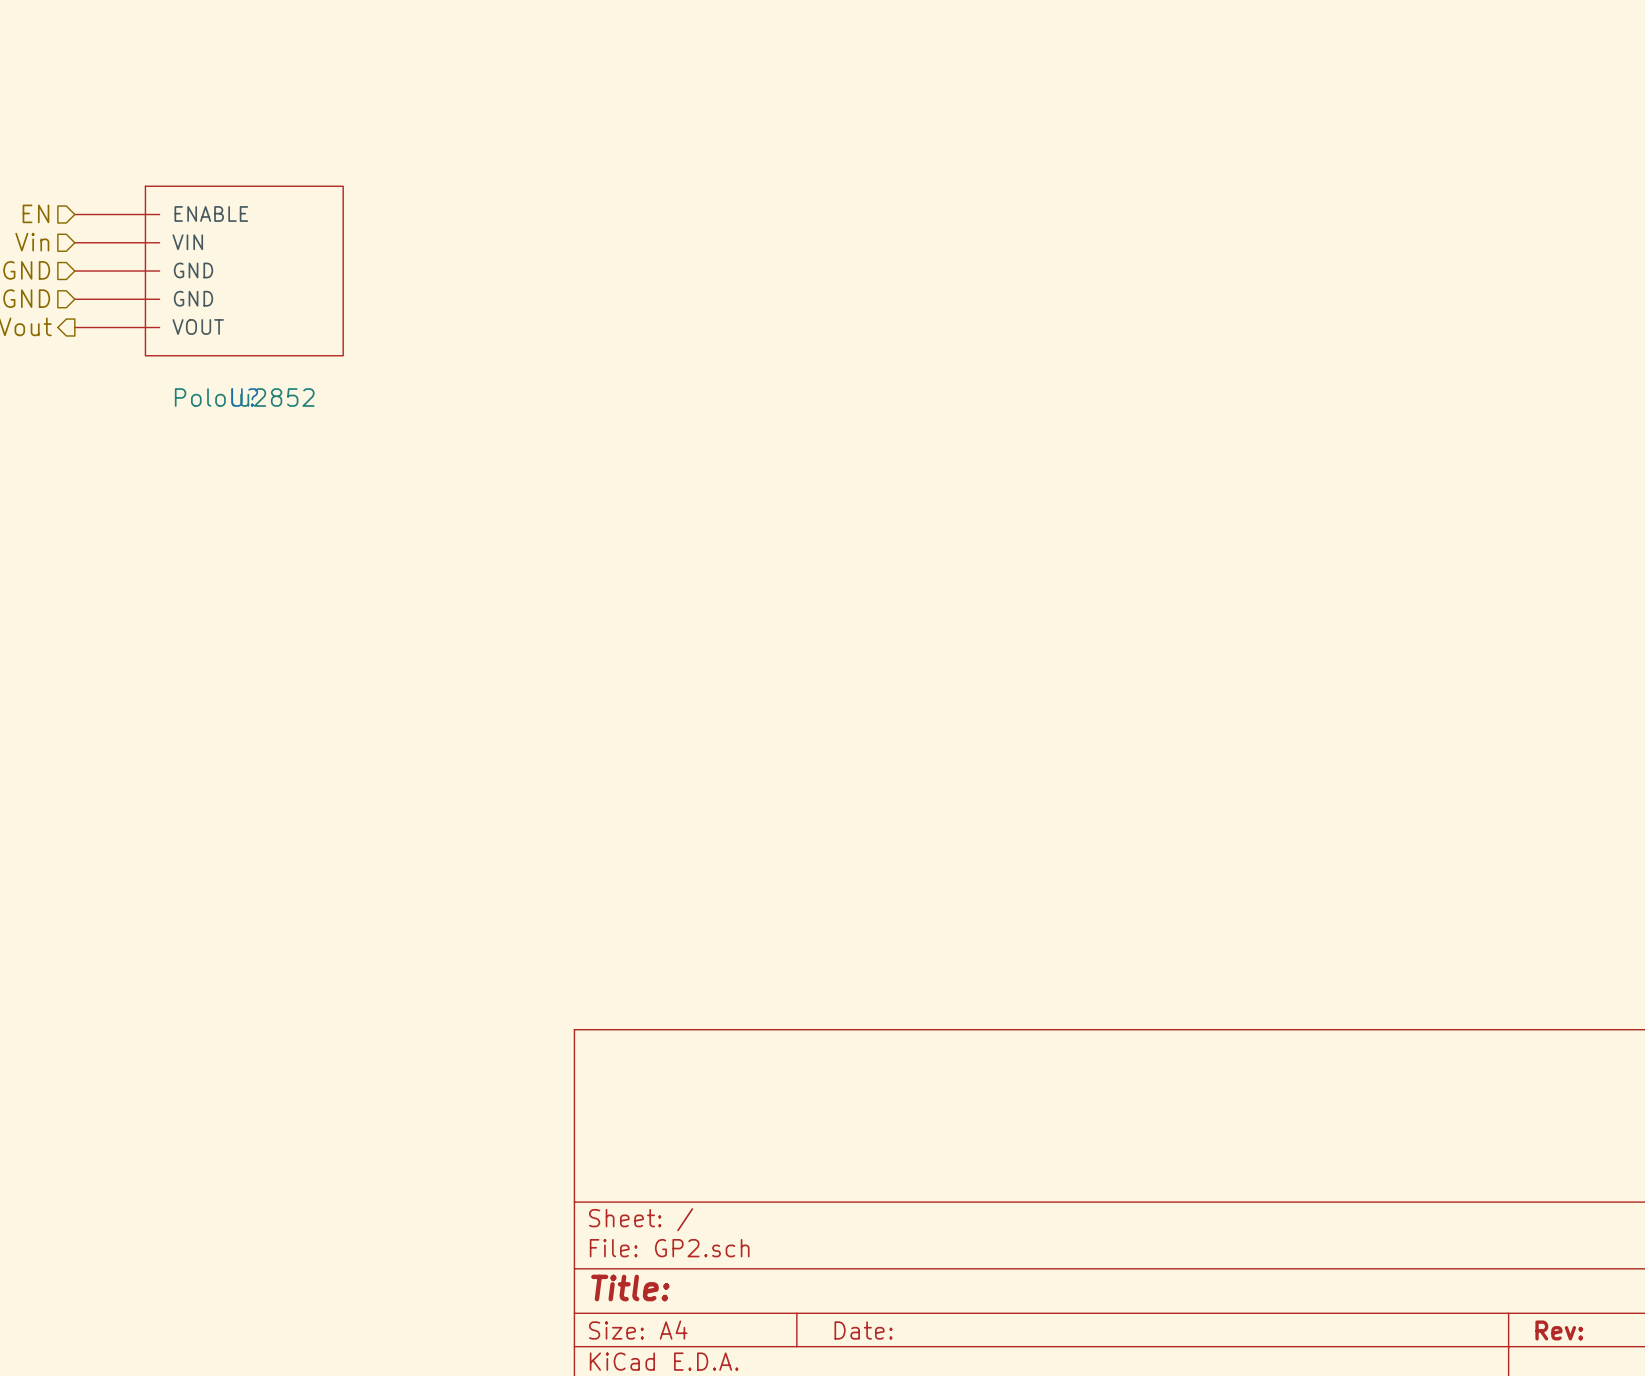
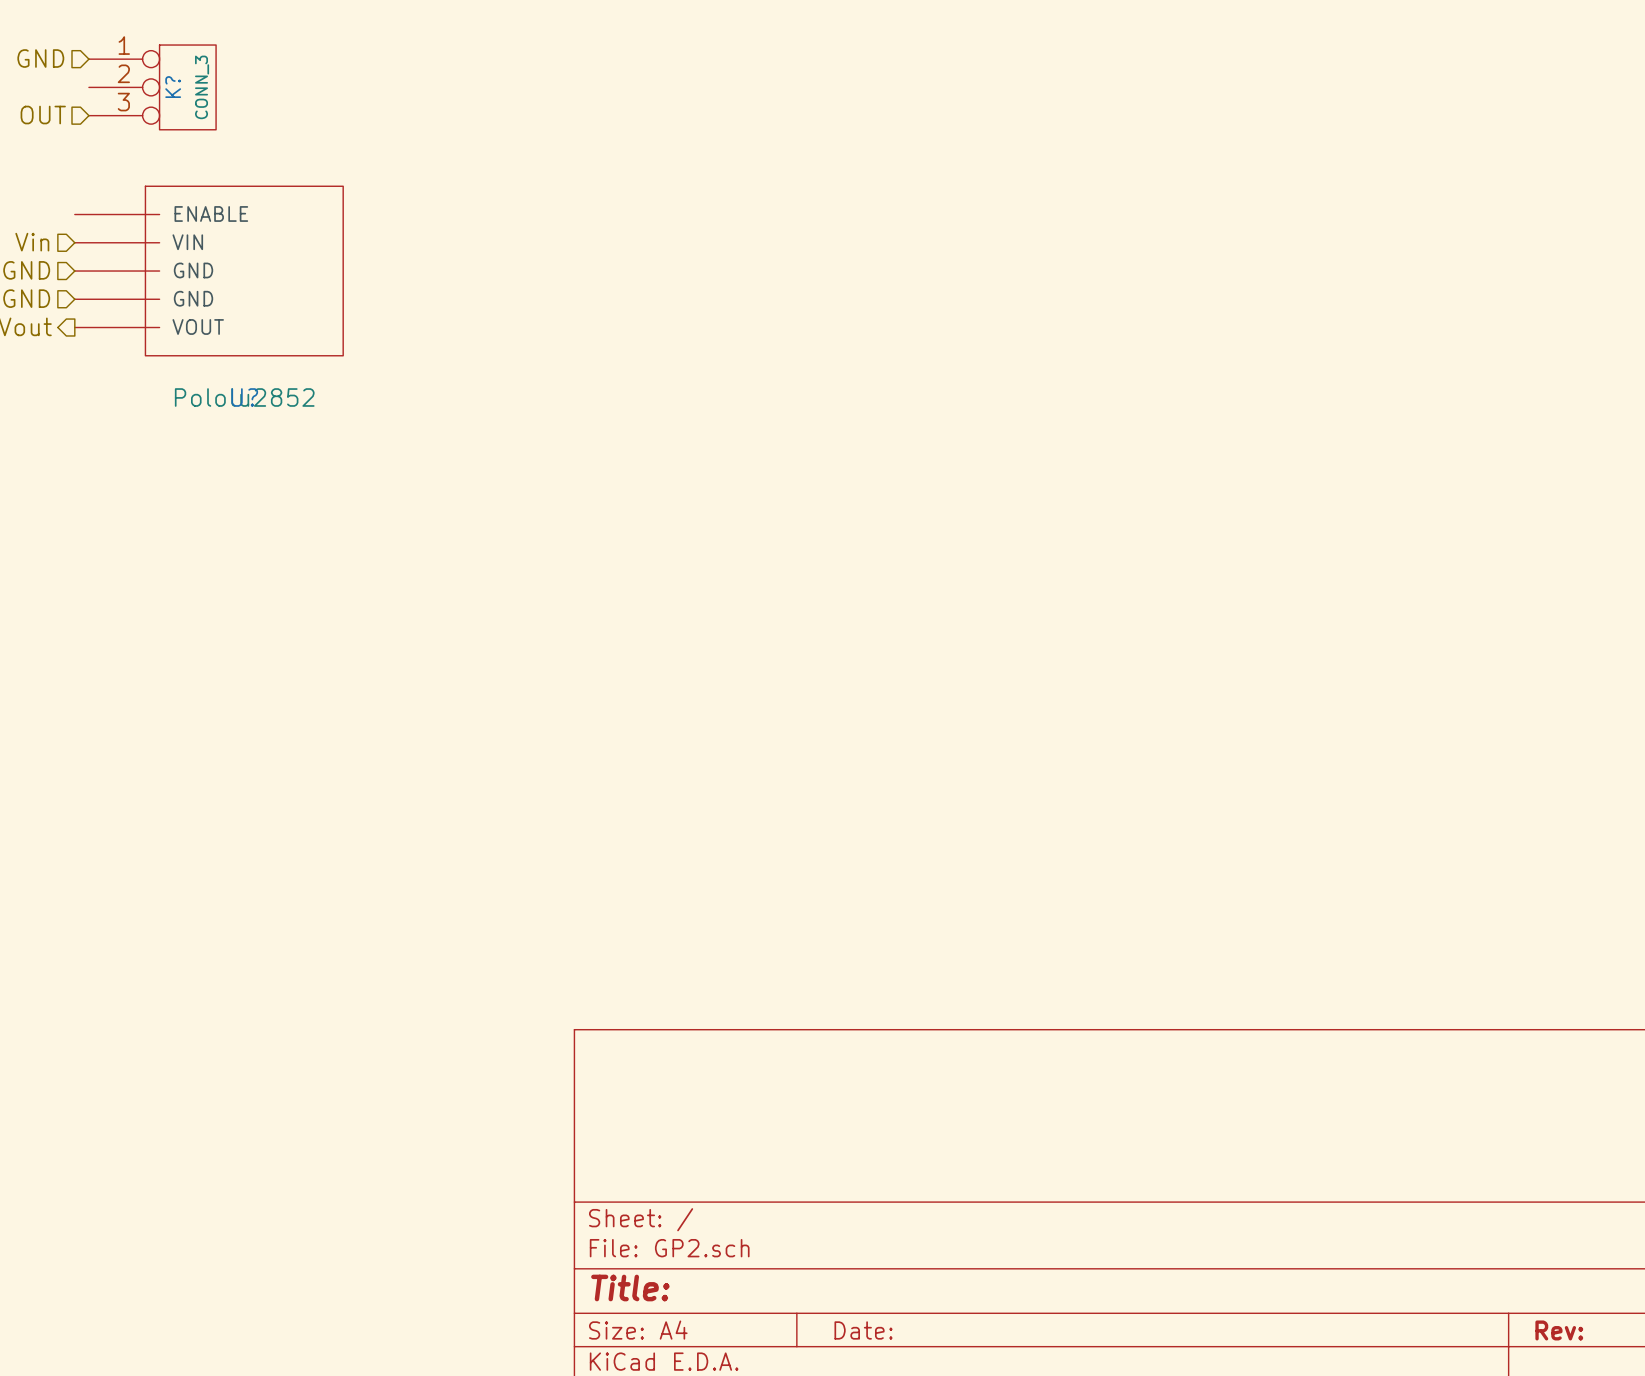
hierarchical label: none -> GND (40, 58)
K?: none -> CONN_3 (152, 87)
hierarchical label: none -> OUT (43, 115)
hierarchical label: EN (35, 213) -> none

